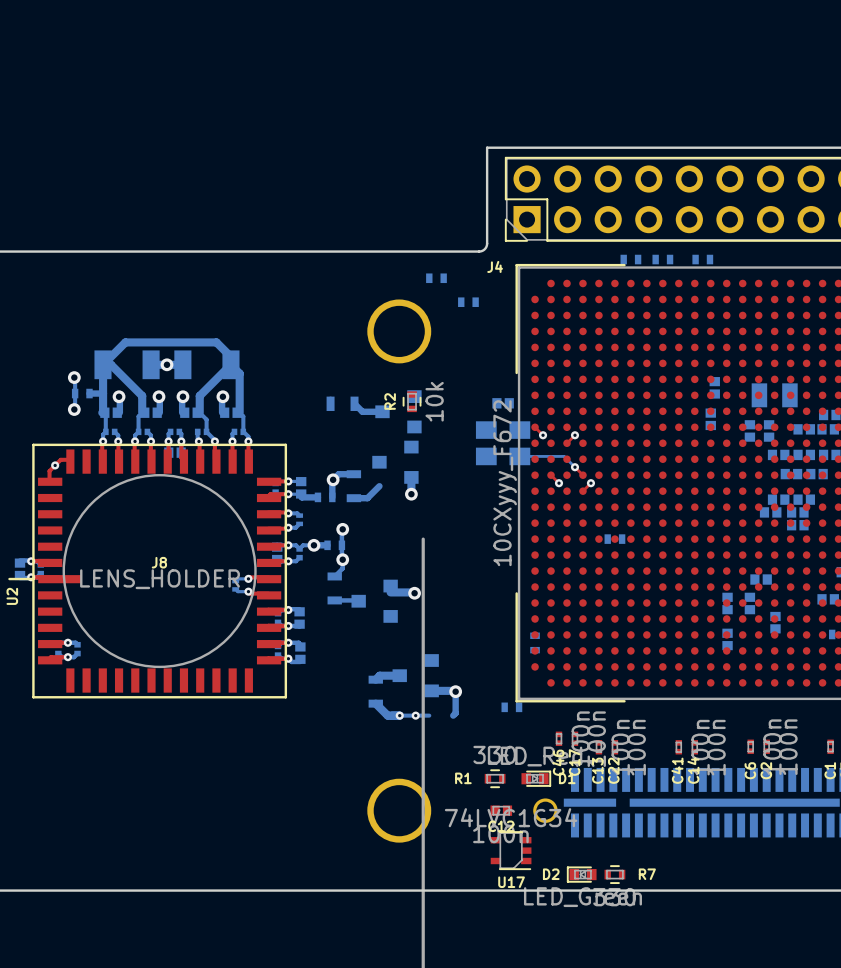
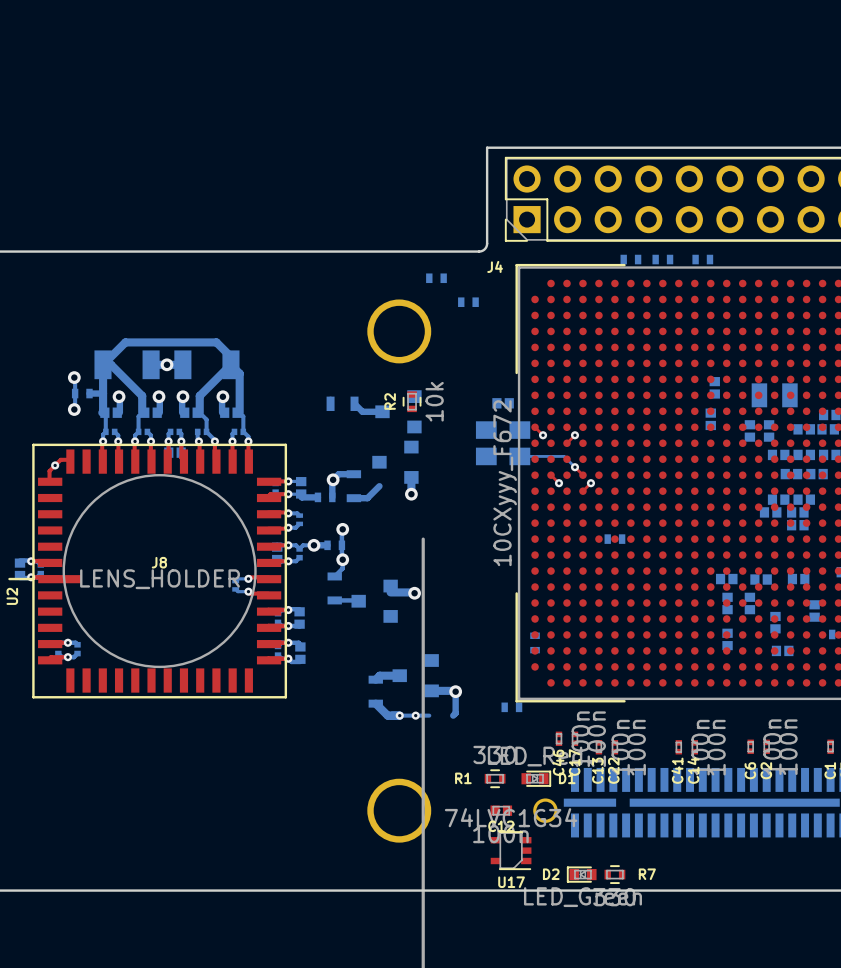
part: none -> (726, 579)
part: none -> (798, 579)
part: (828, 599) -> none
part: none -> (814, 610)
part: none -> (782, 650)

